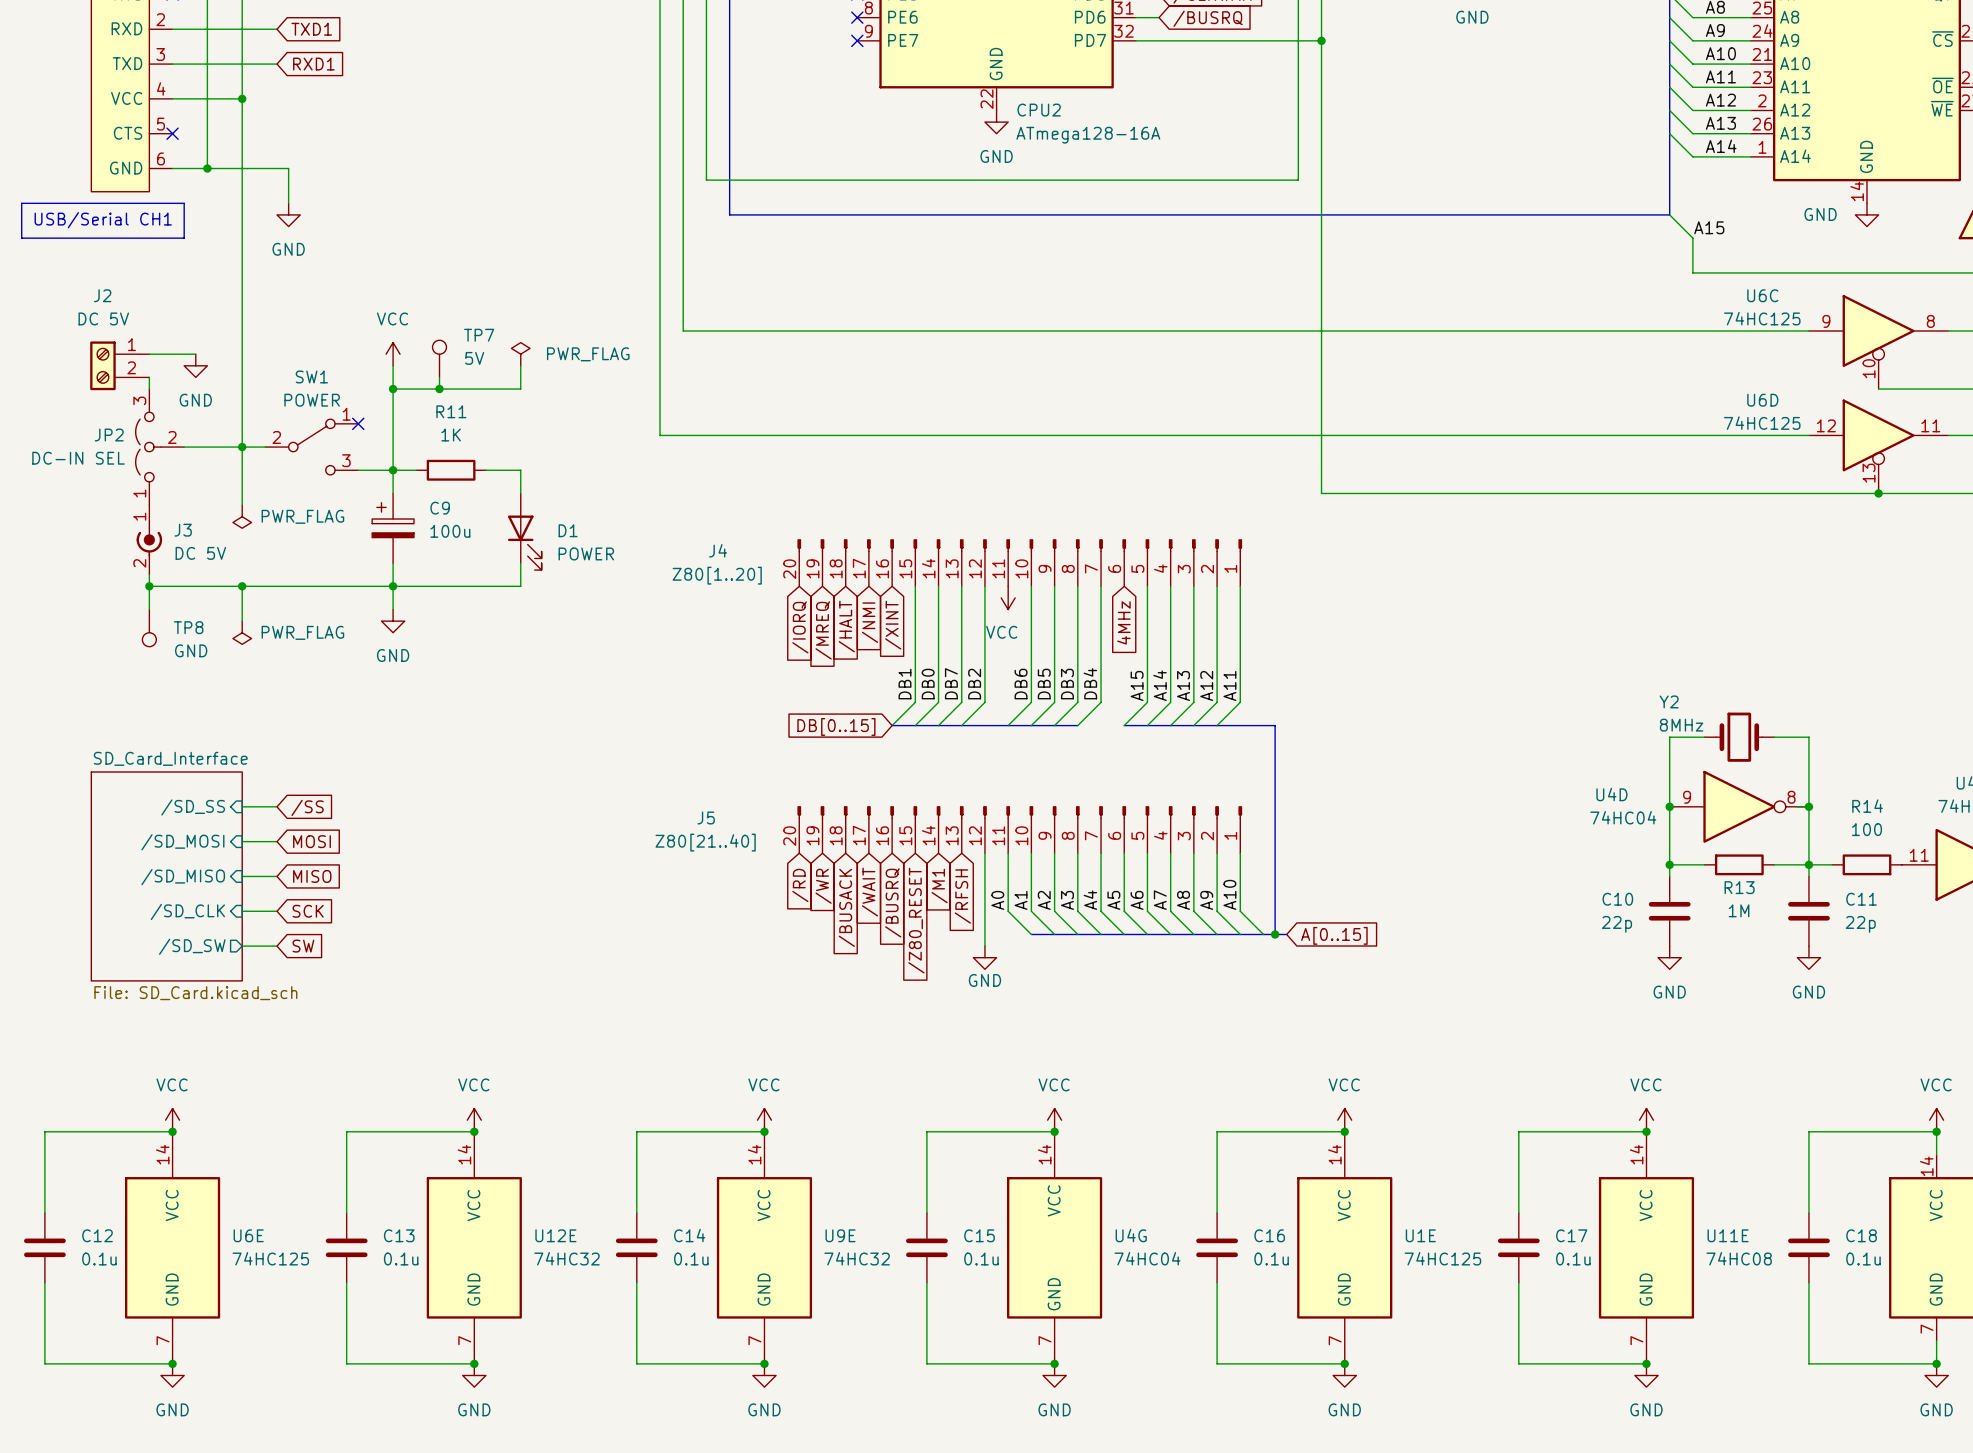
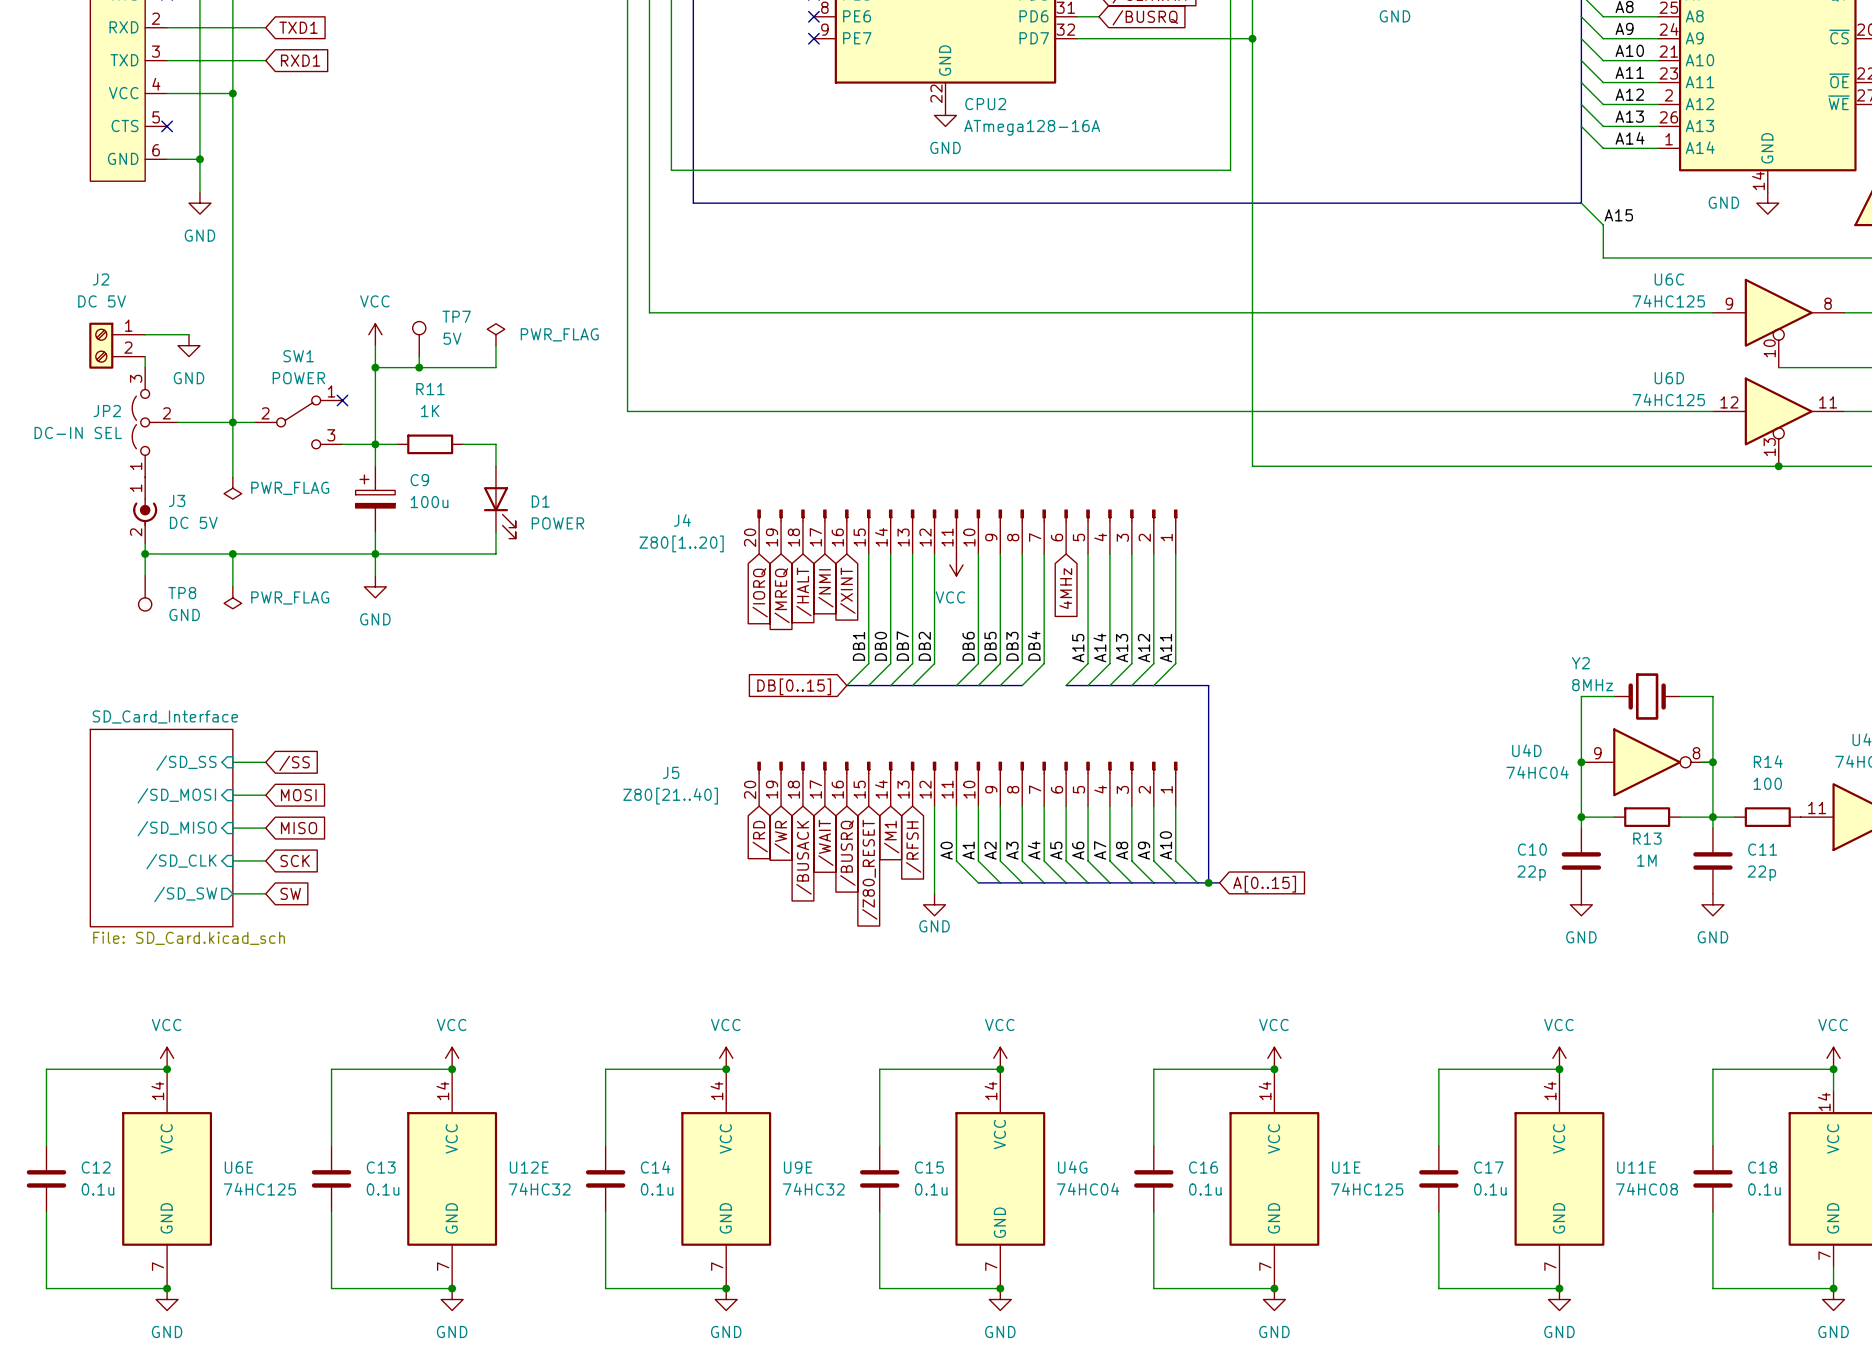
wire: (207, 168) (288, 168) (288, 203) -> (199, 159) (199, 192)
line: (21, 203) (184, 203) (184, 238) (21, 238) (21, 203) -> none
power symbol position: GND (288, 214) -> GND (199, 203)
text: USB/Serial CH1 (103, 220) -> none

